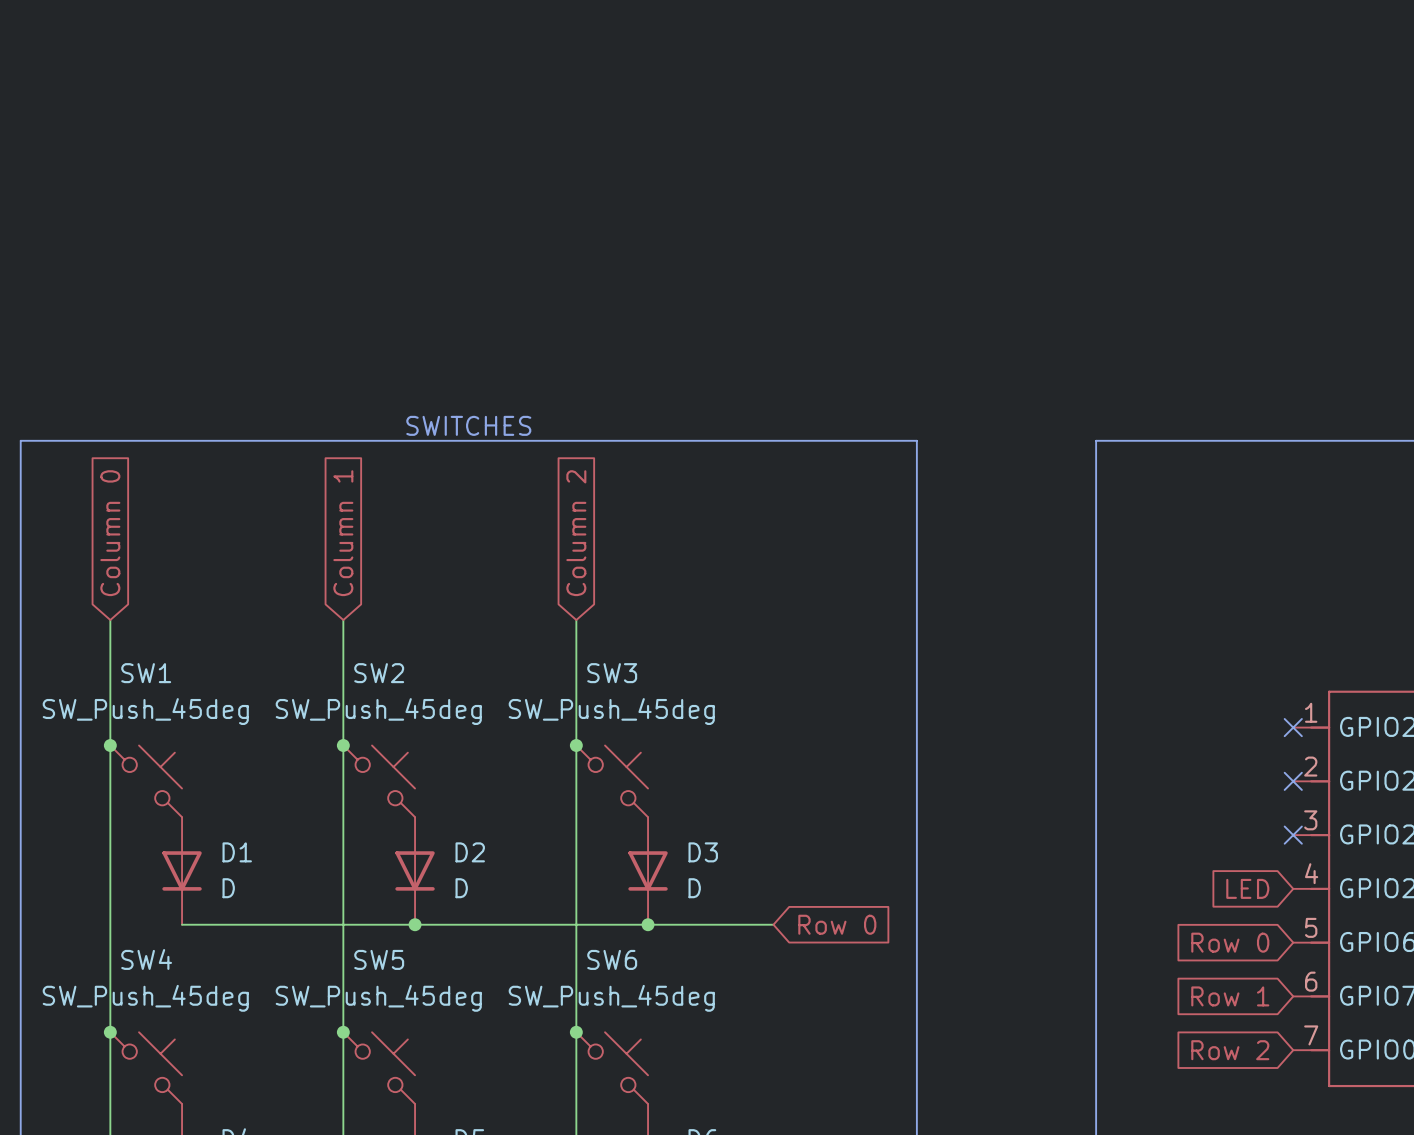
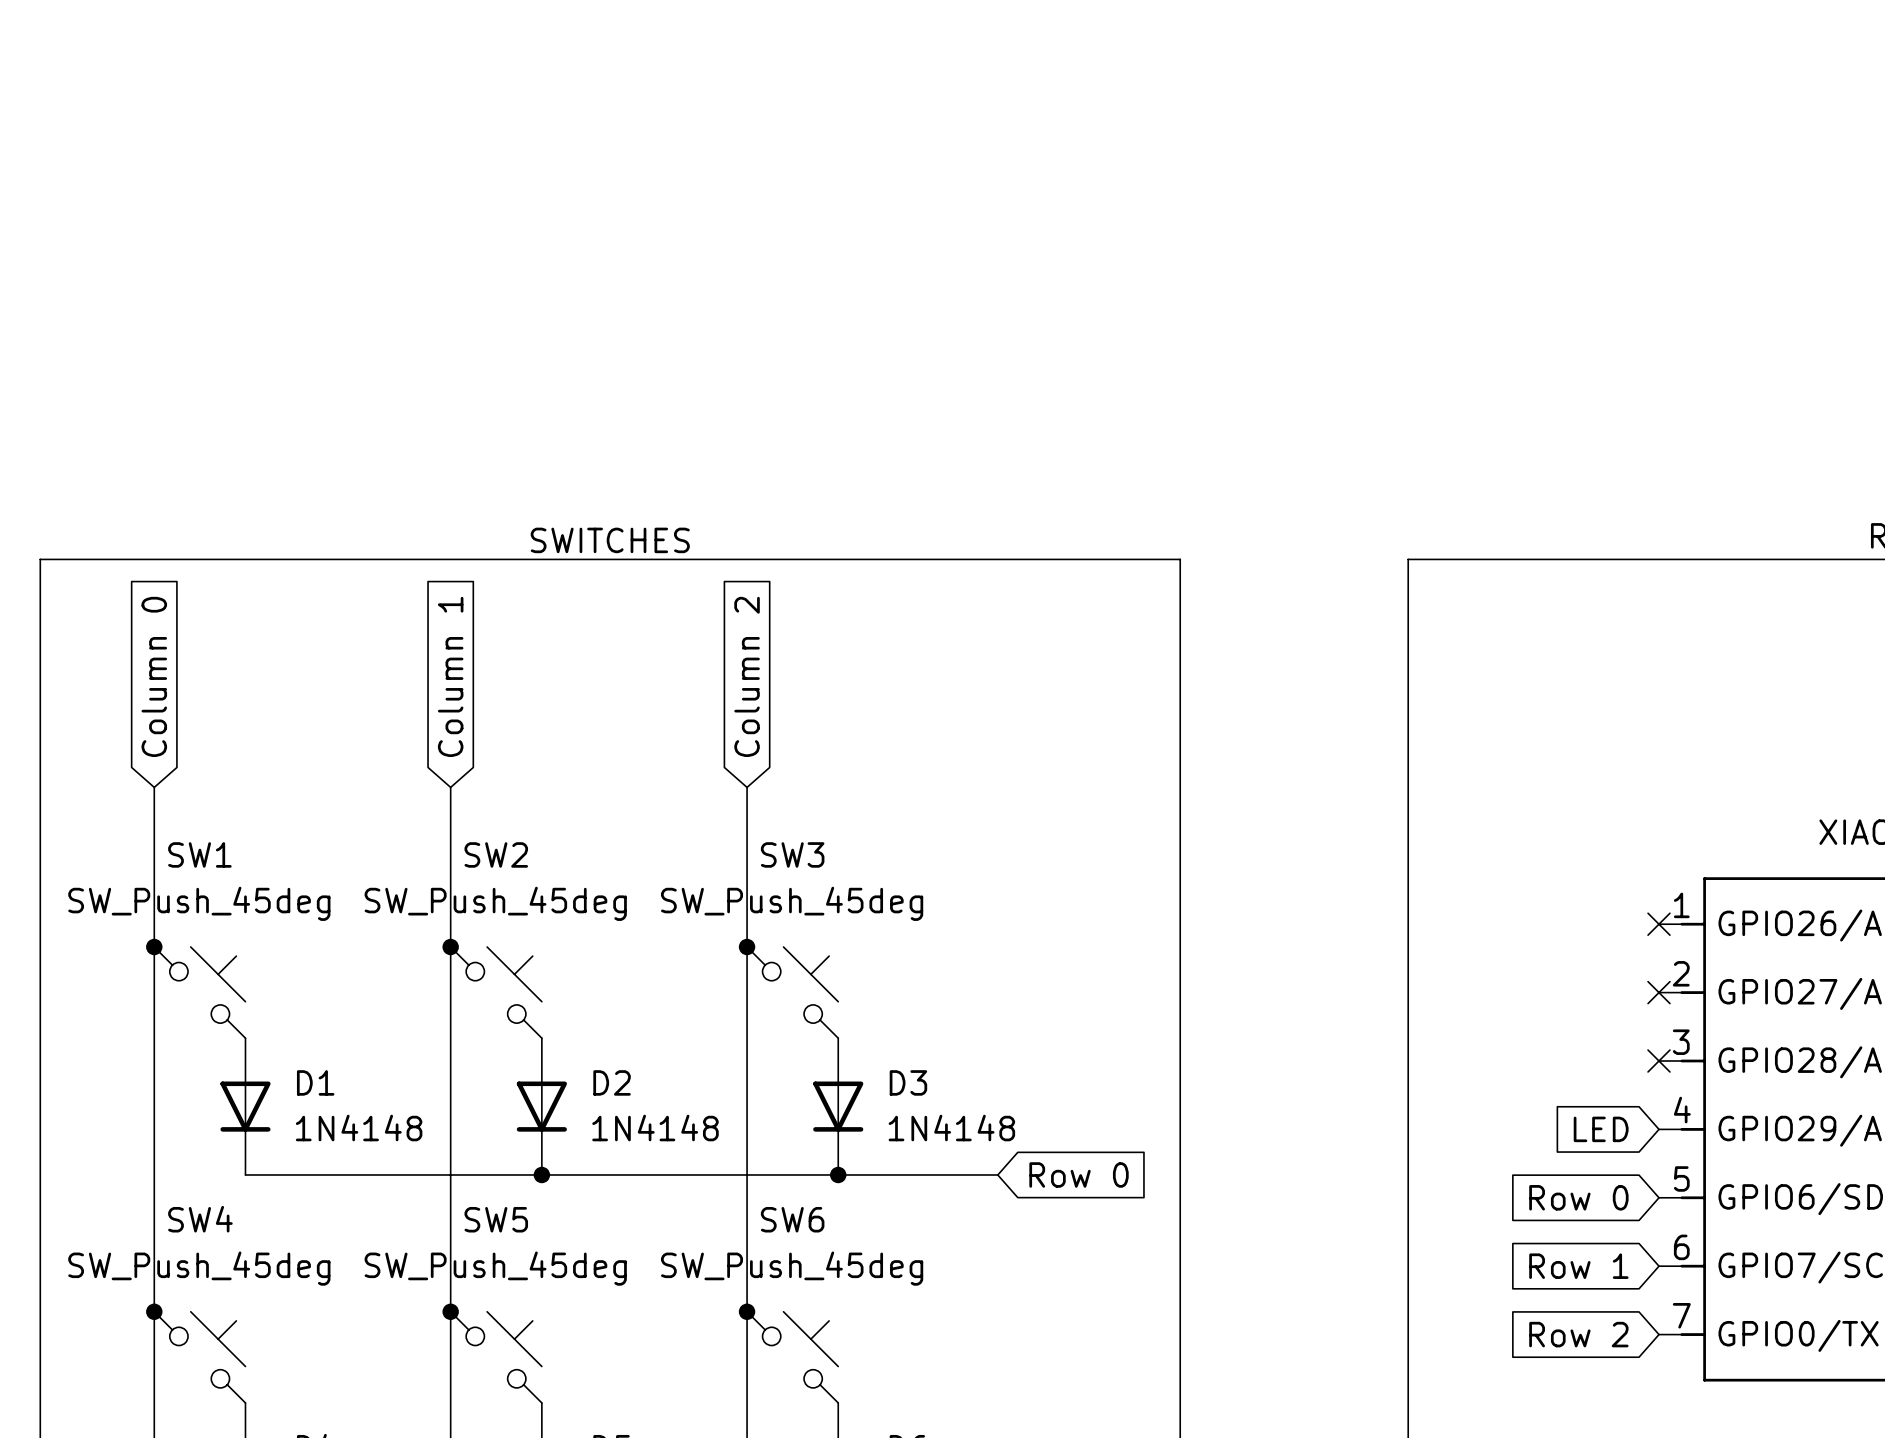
D1 value: D (228, 888) -> 1N4148 (359, 1127)
D2 value: D (461, 888) -> 1N4148 (655, 1127)
D3 value: D (694, 888) -> 1N4148 (951, 1127)

